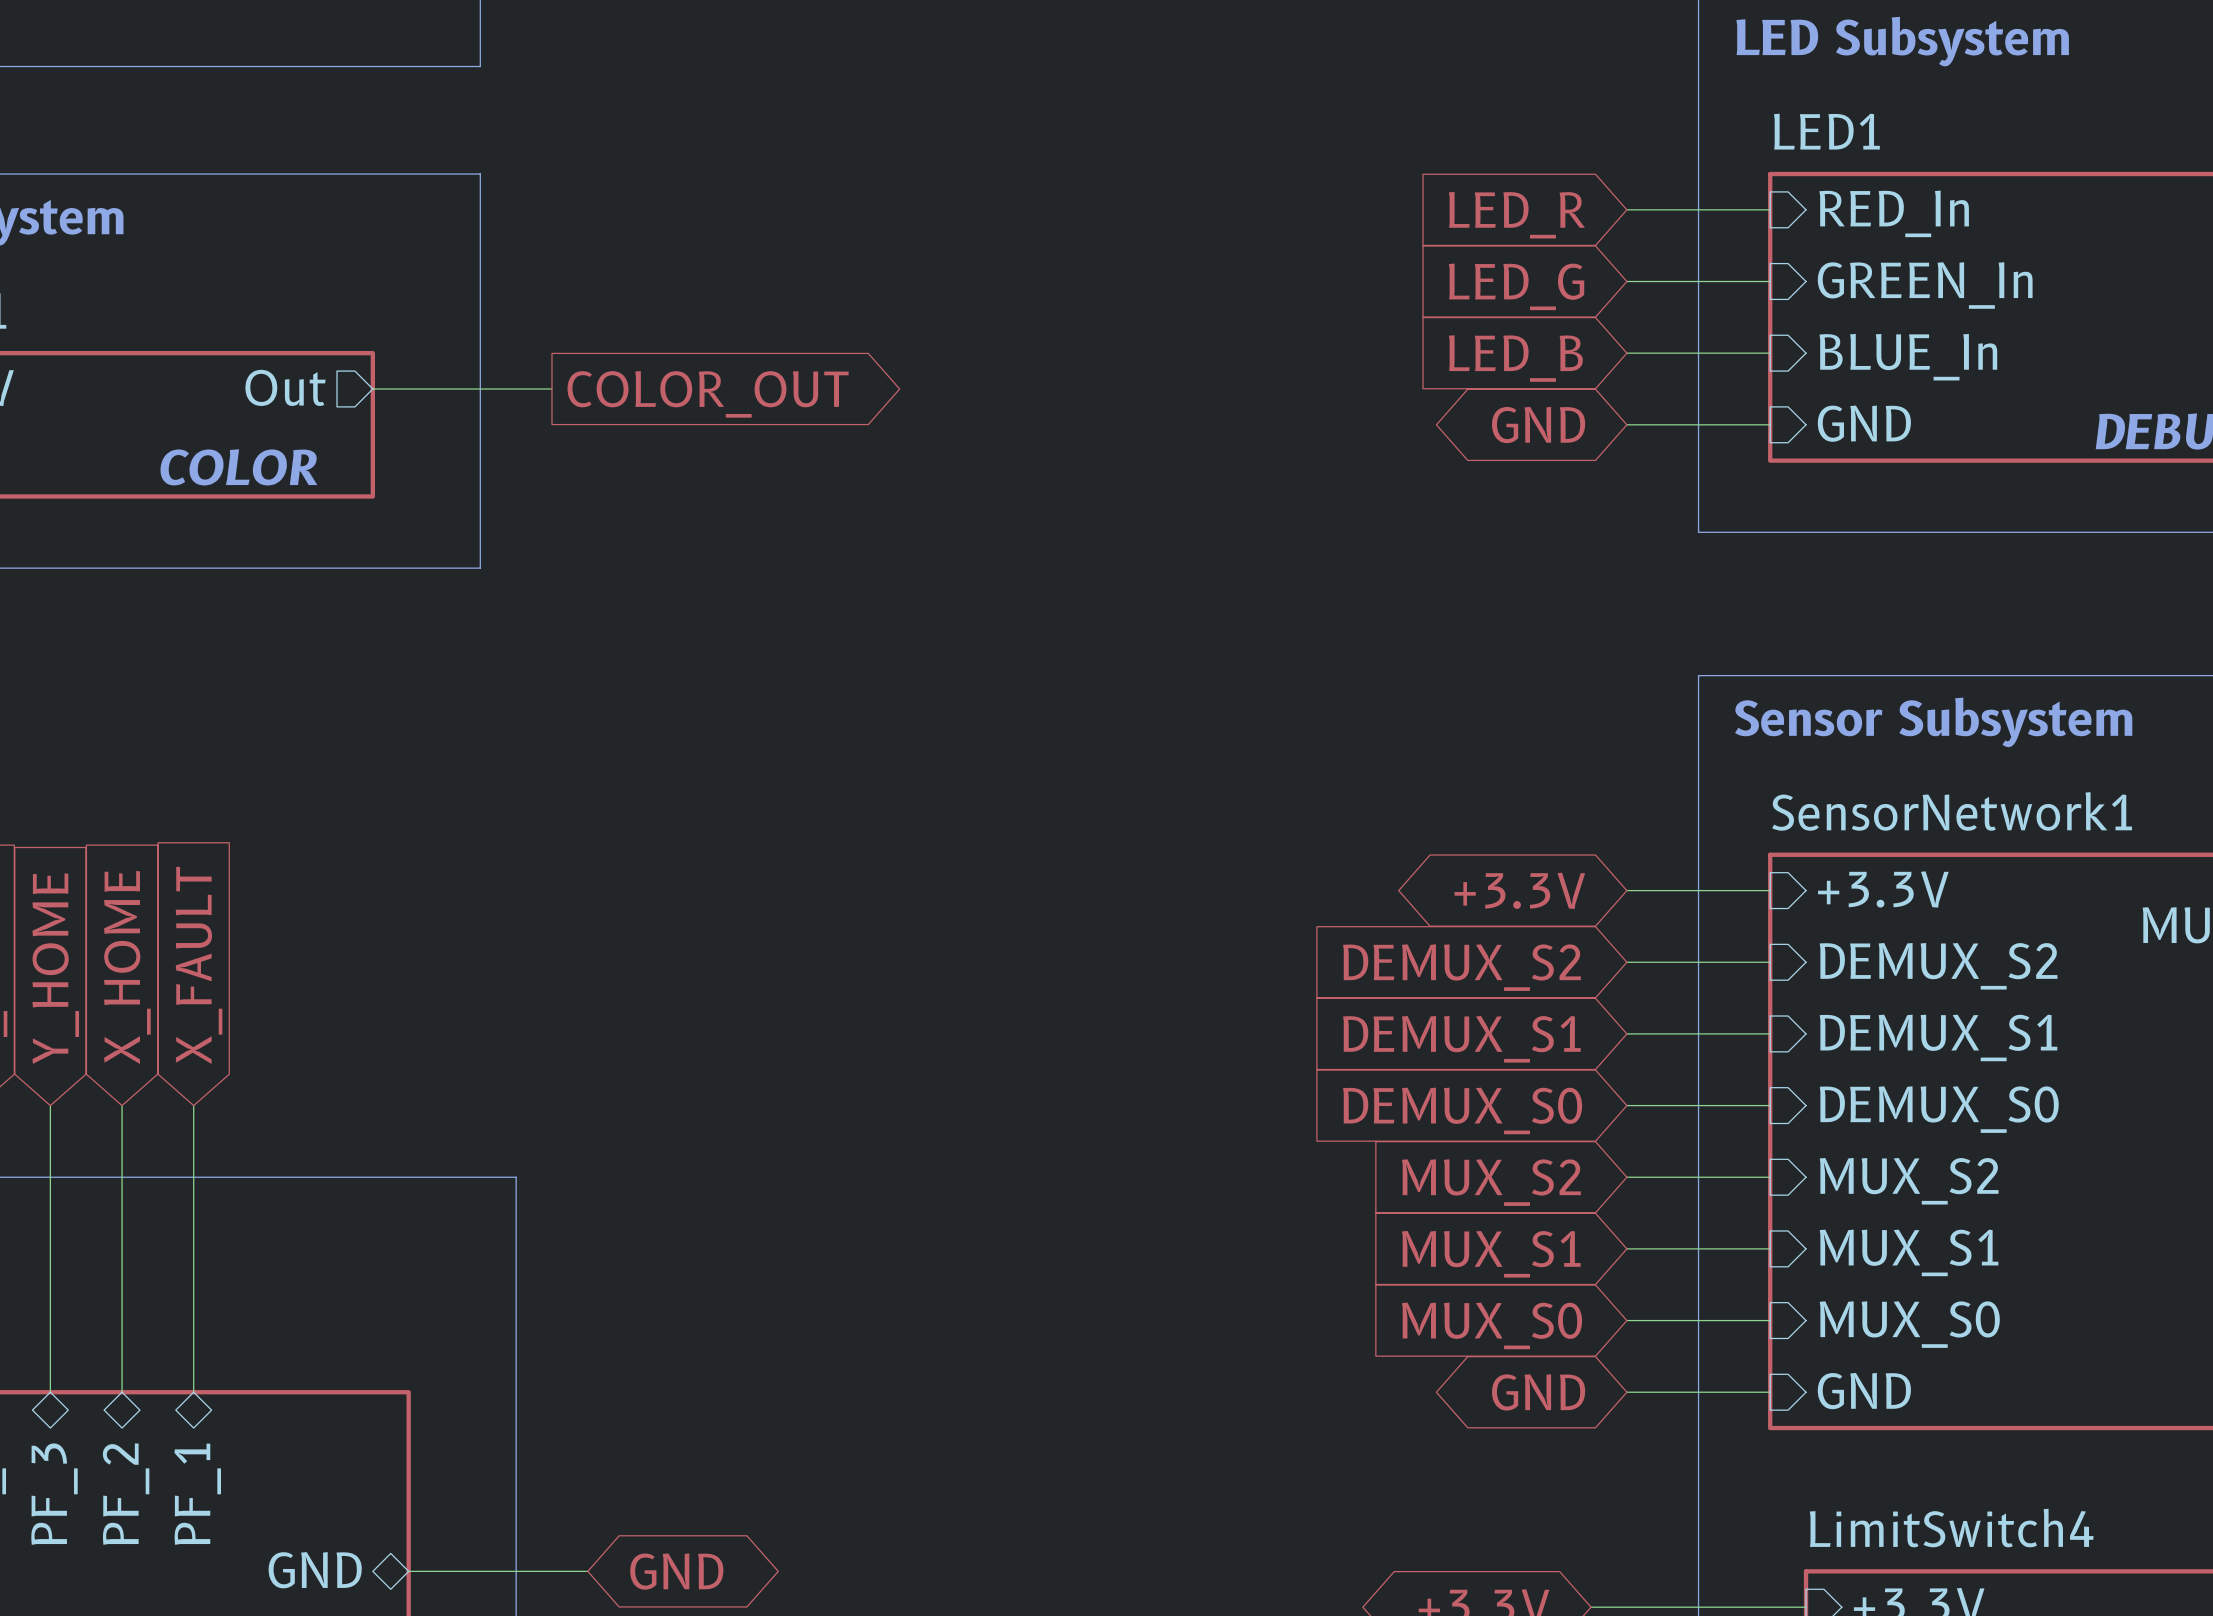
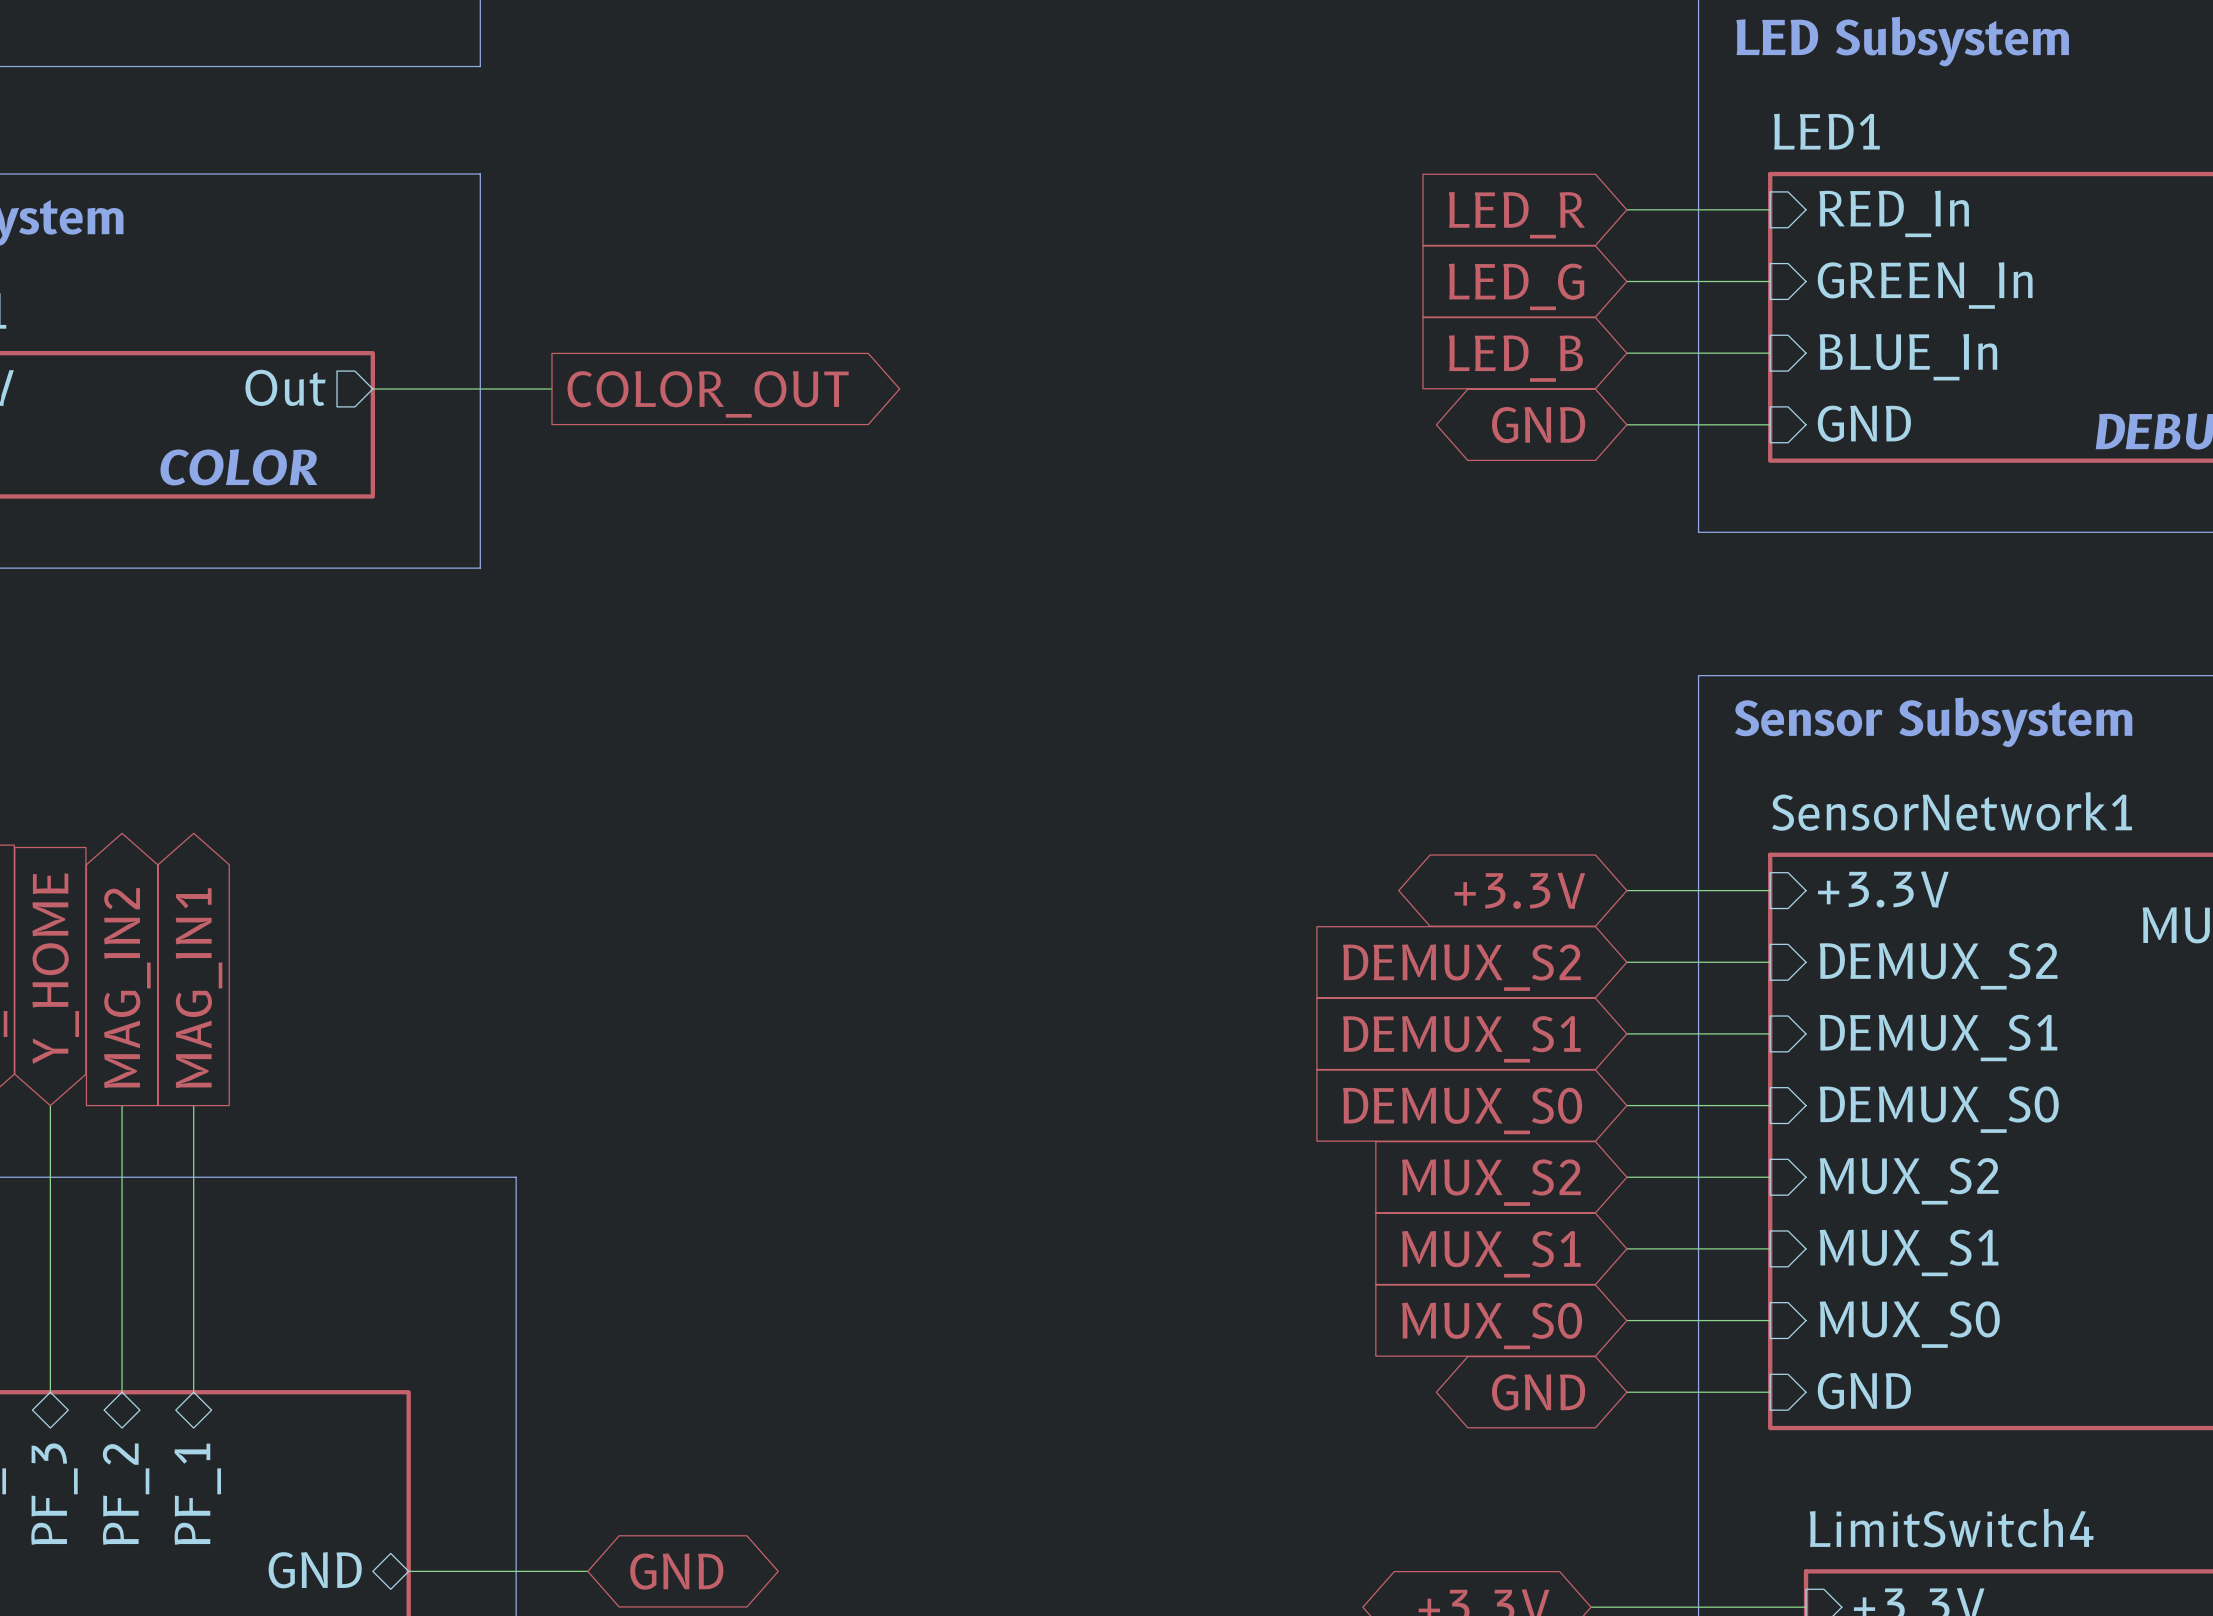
global label shape: input (199, 965) -> output (199, 988)
global label: X_FAULT (199, 965) -> MAG_IN1 (199, 988)
global label shape: input (127, 967) -> output (127, 988)
global label: X_HOME (127, 967) -> MAG_IN2 (127, 988)

